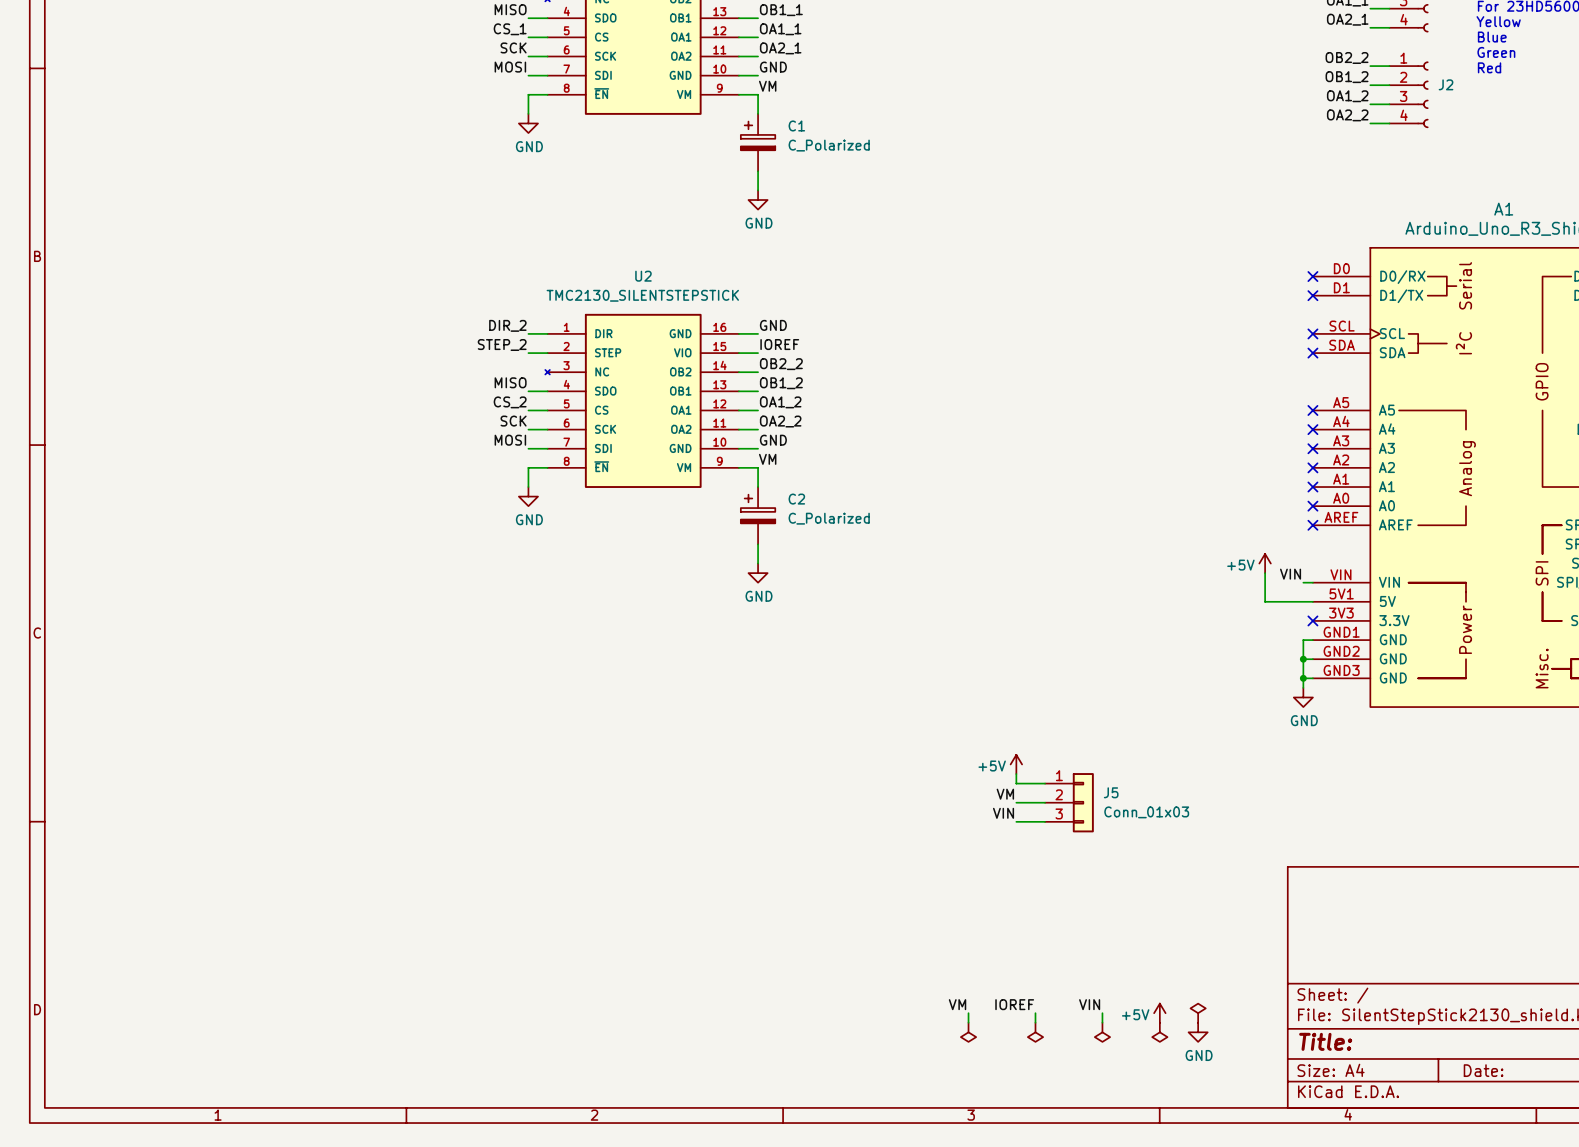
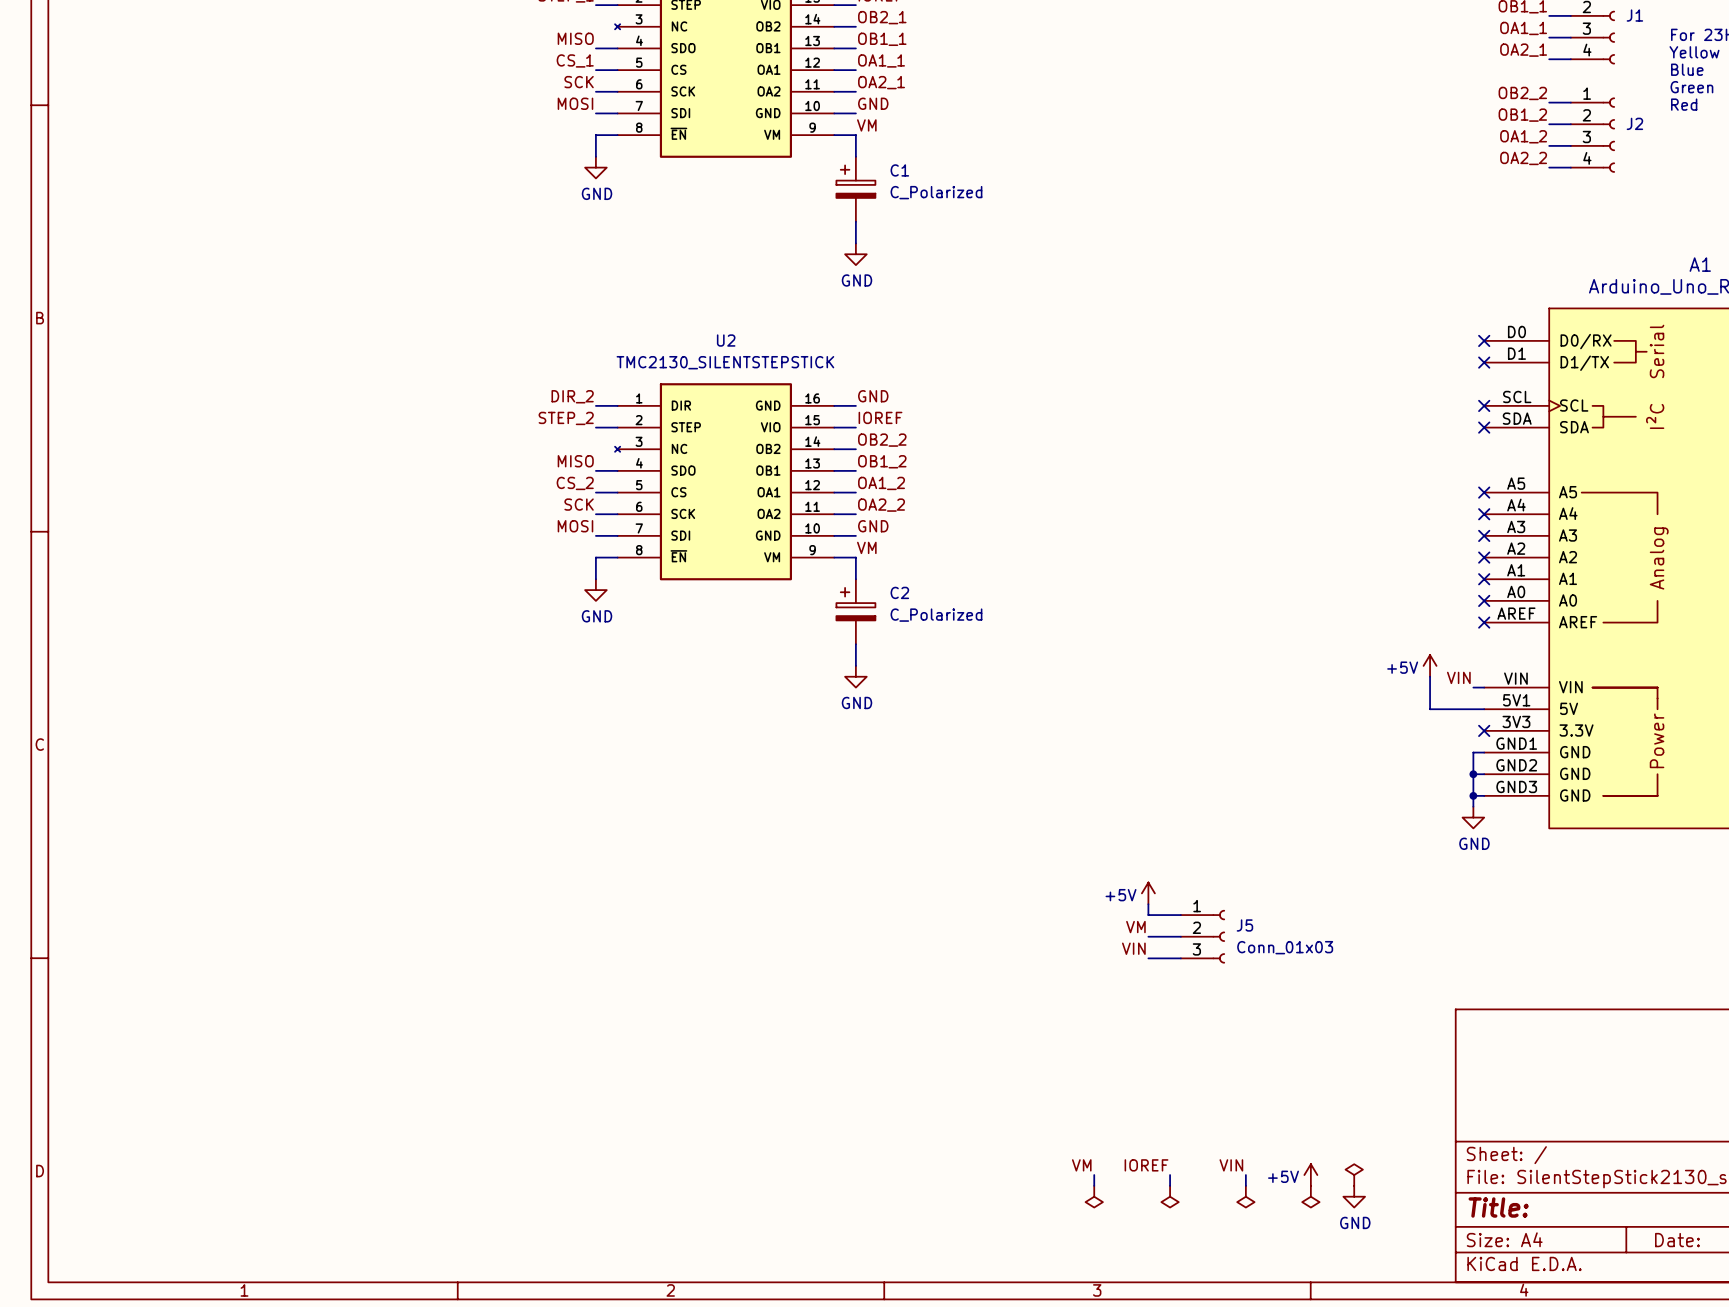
J5 symbol: [1045, 773, 1094, 833] -> [1180, 910, 1225, 964]

